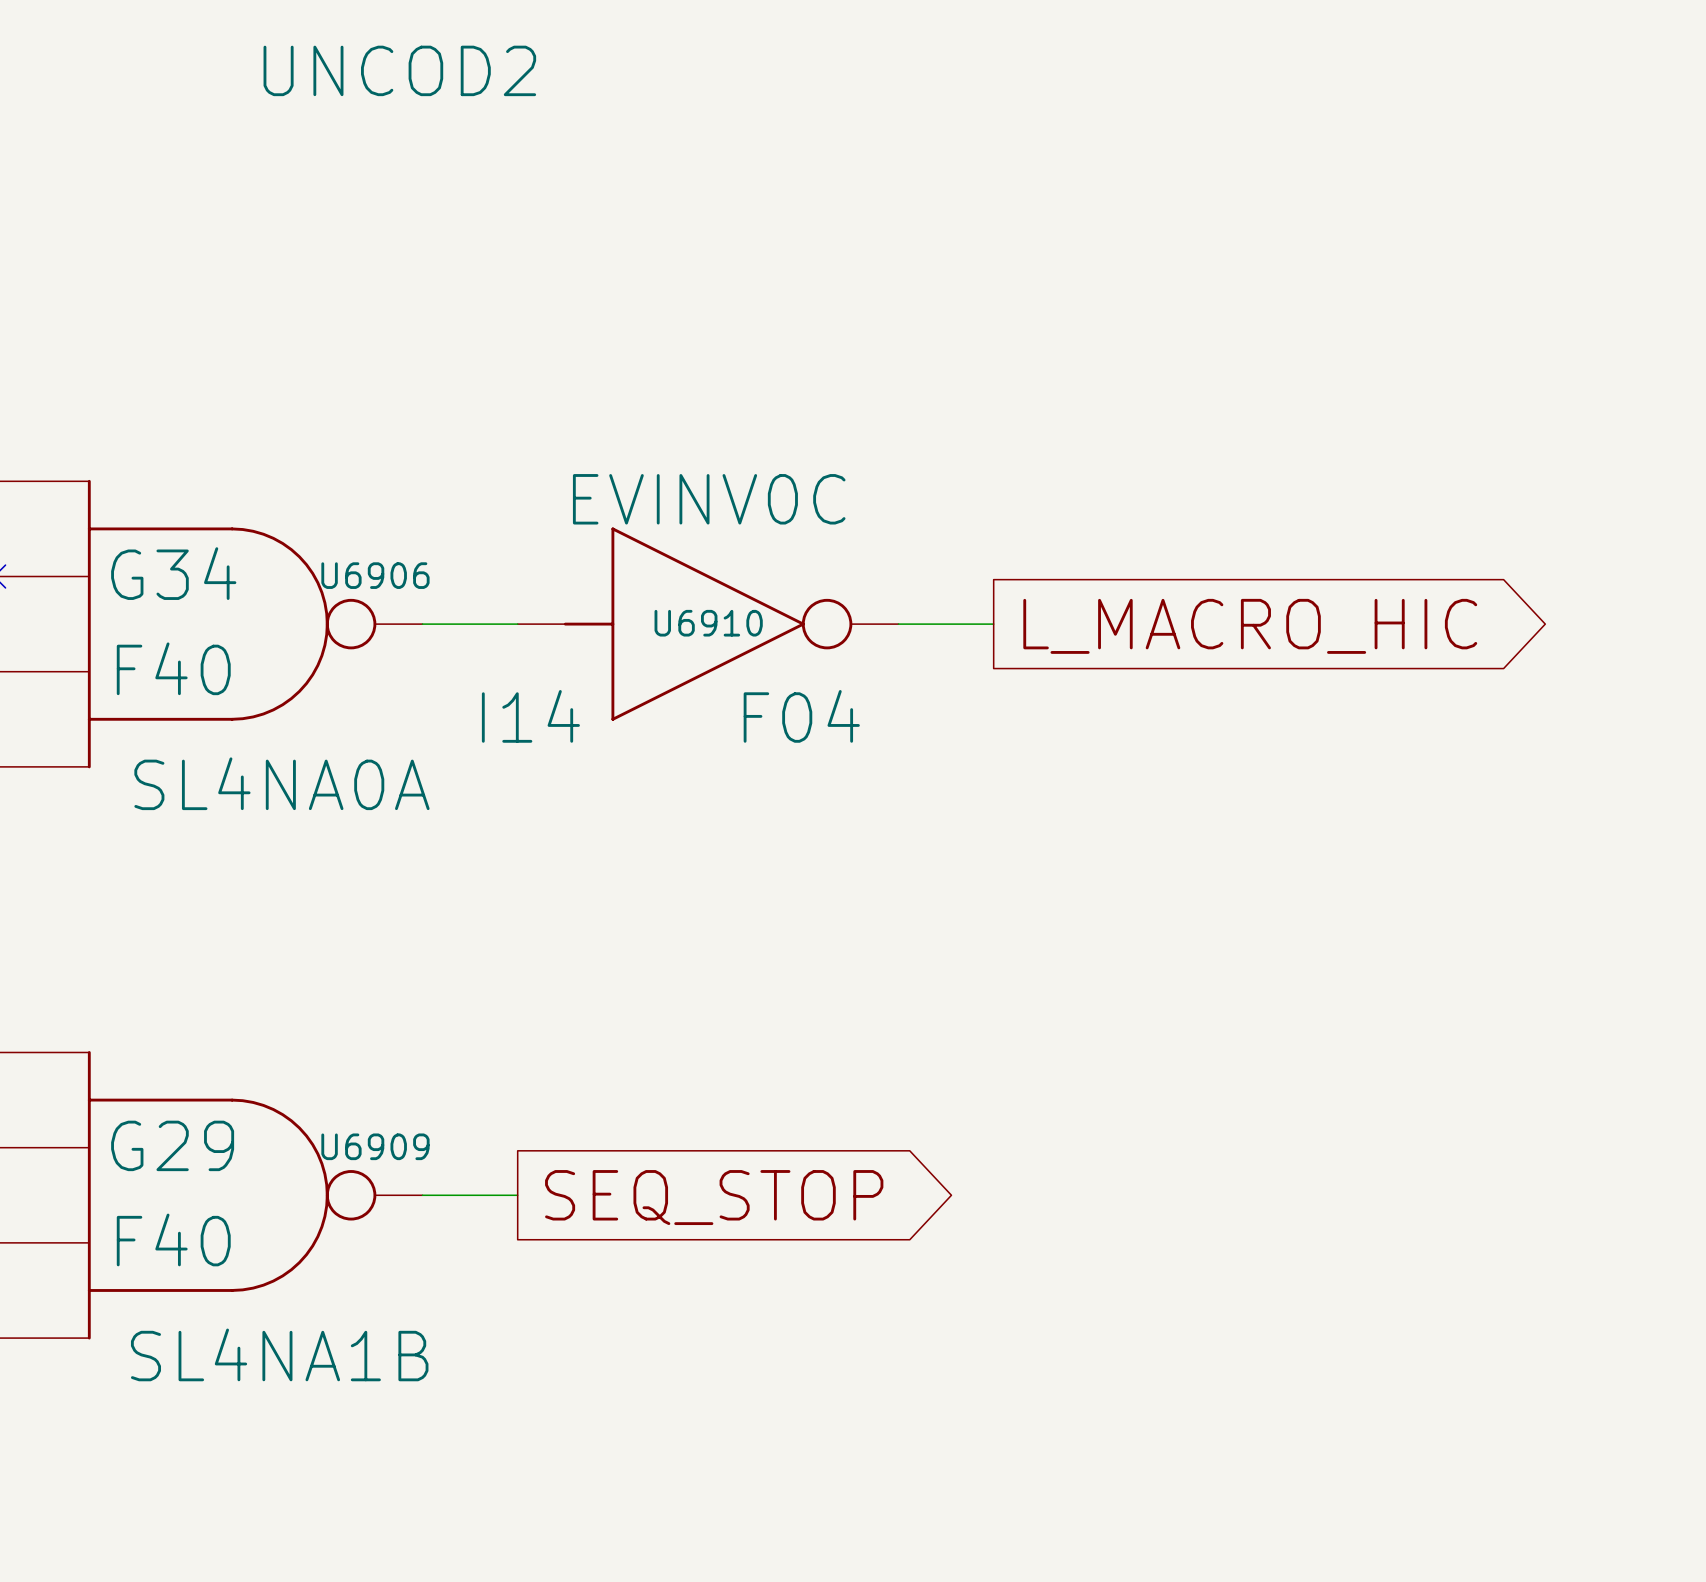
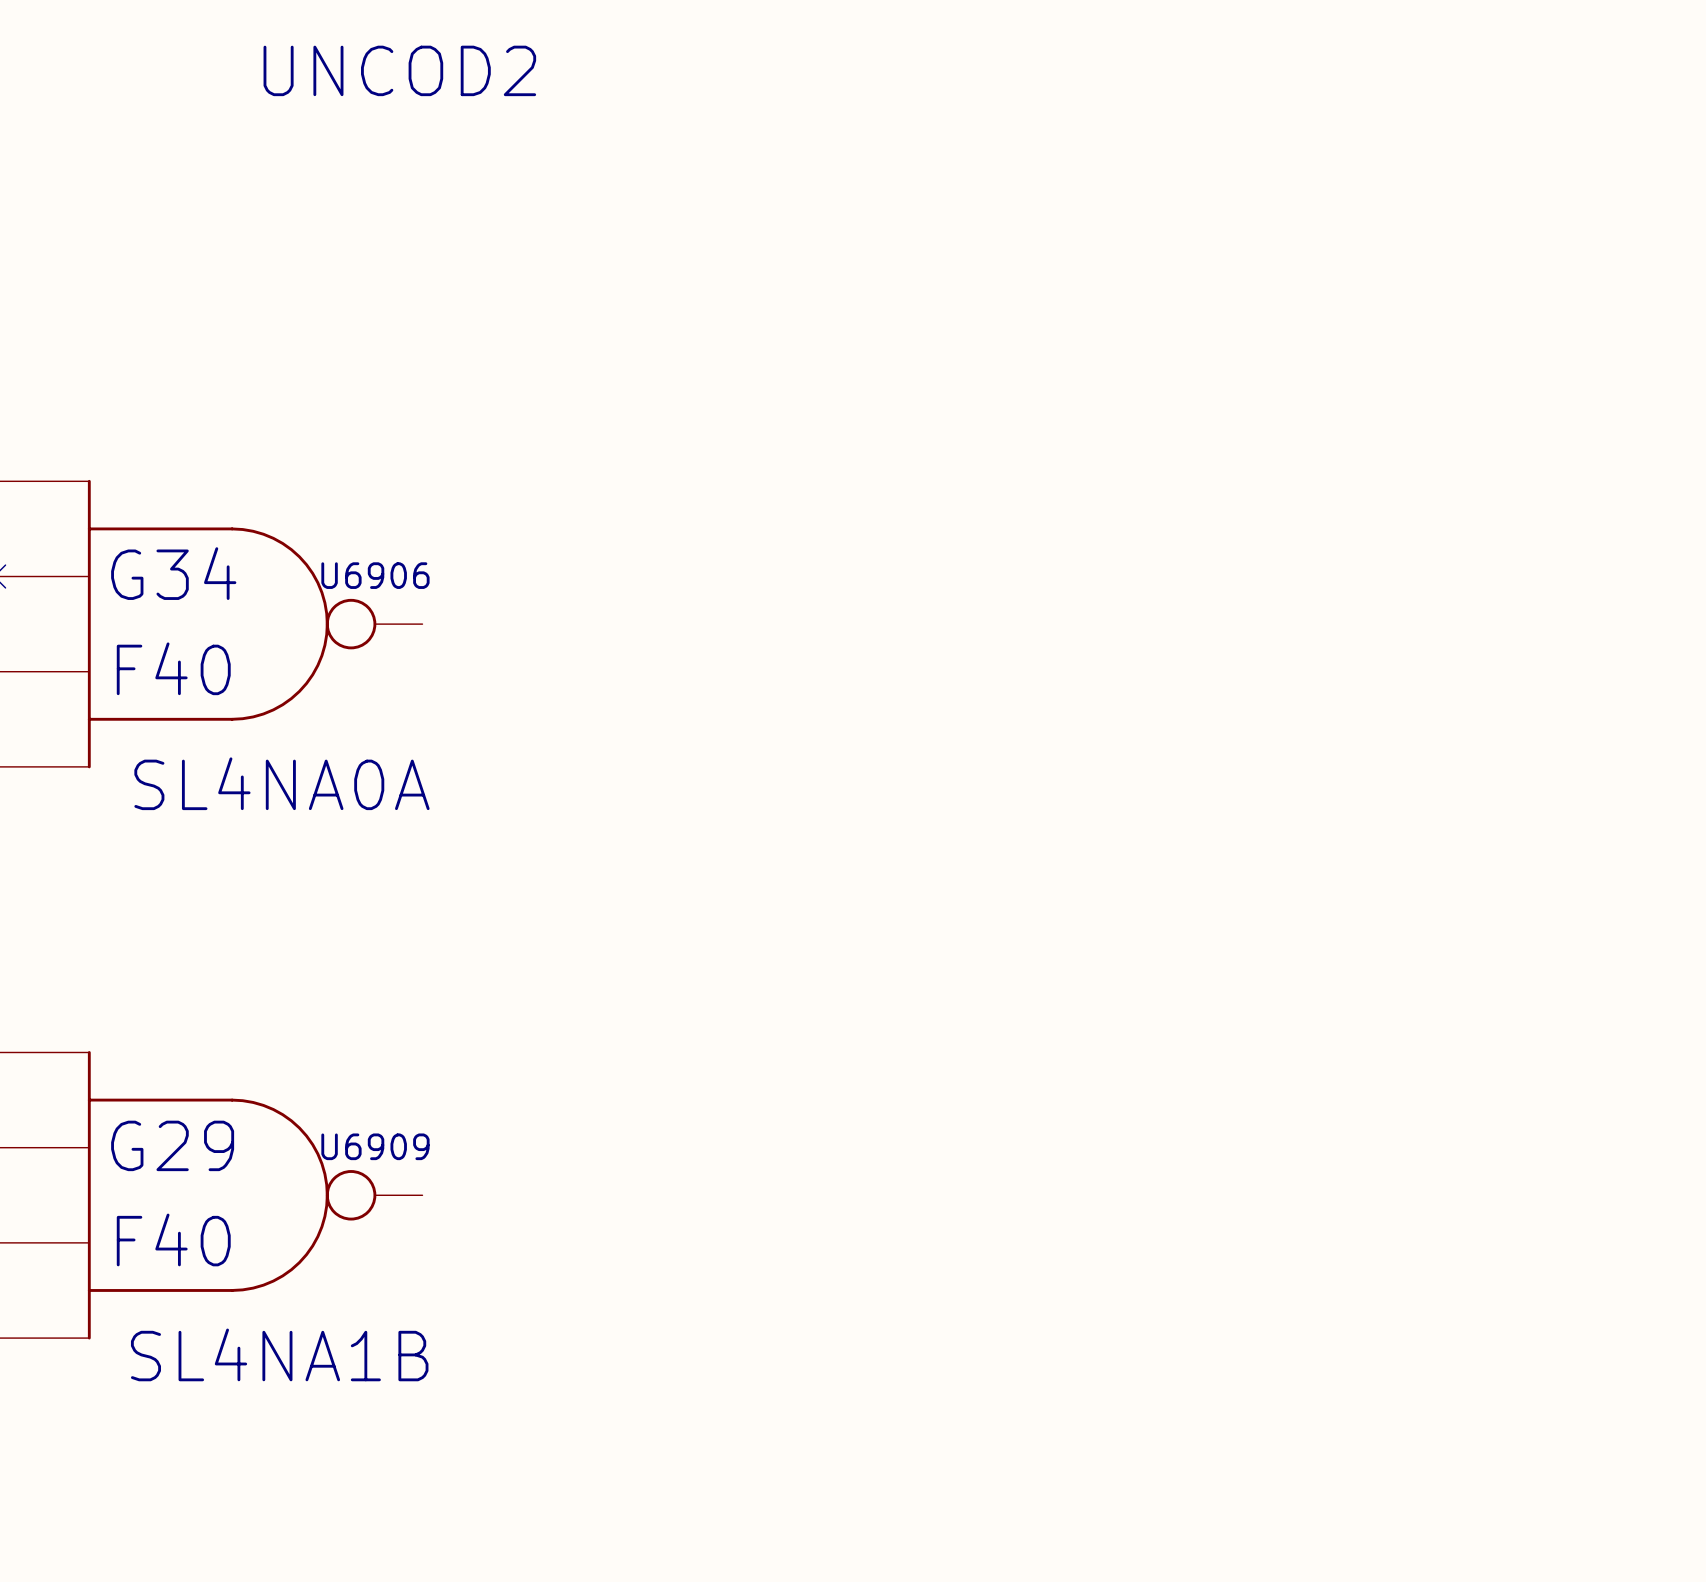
wire: (422, 624) (517, 624) -> none
U6910: F04 (708, 624) -> none
wire: (898, 624) (993, 624) -> none
global label: L_MACRO_HIC (1250, 626) -> none
wire: (422, 1195) (517, 1195) -> none
global label: SEQ_STOP (714, 1197) -> none

